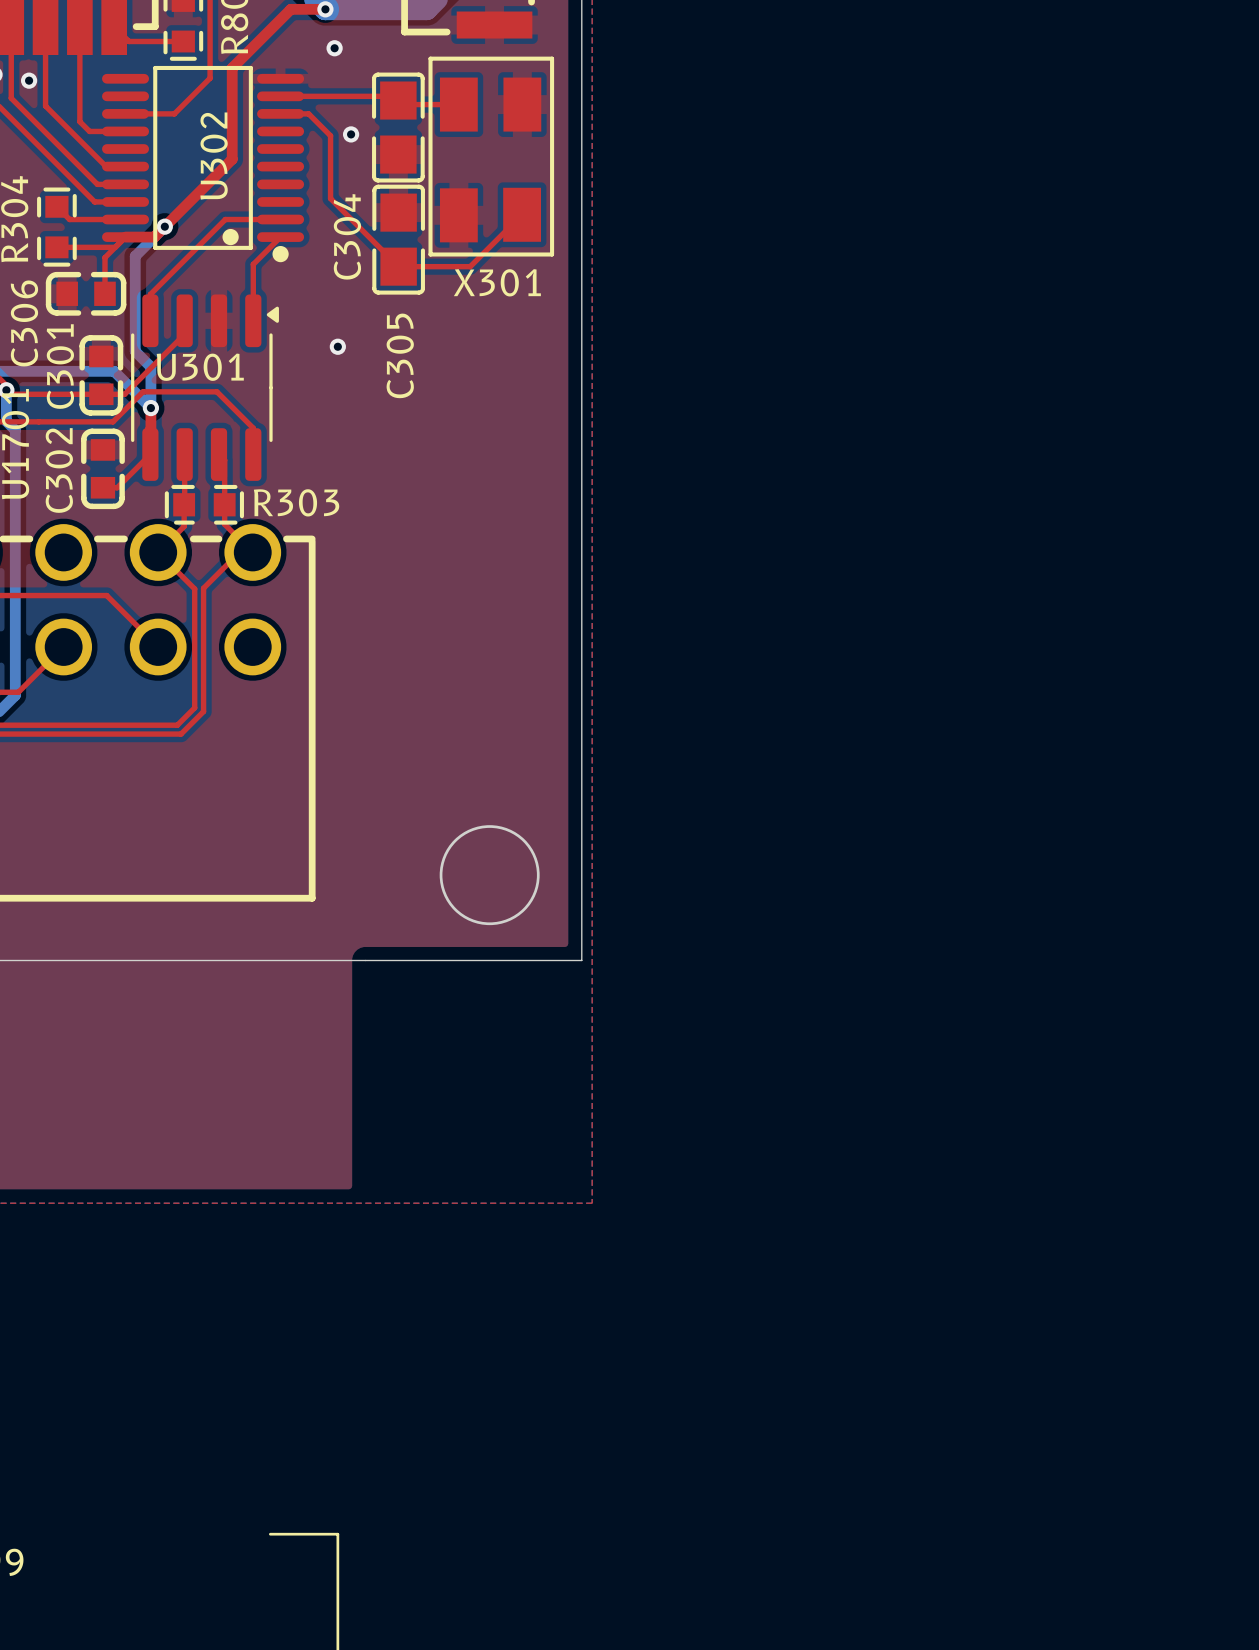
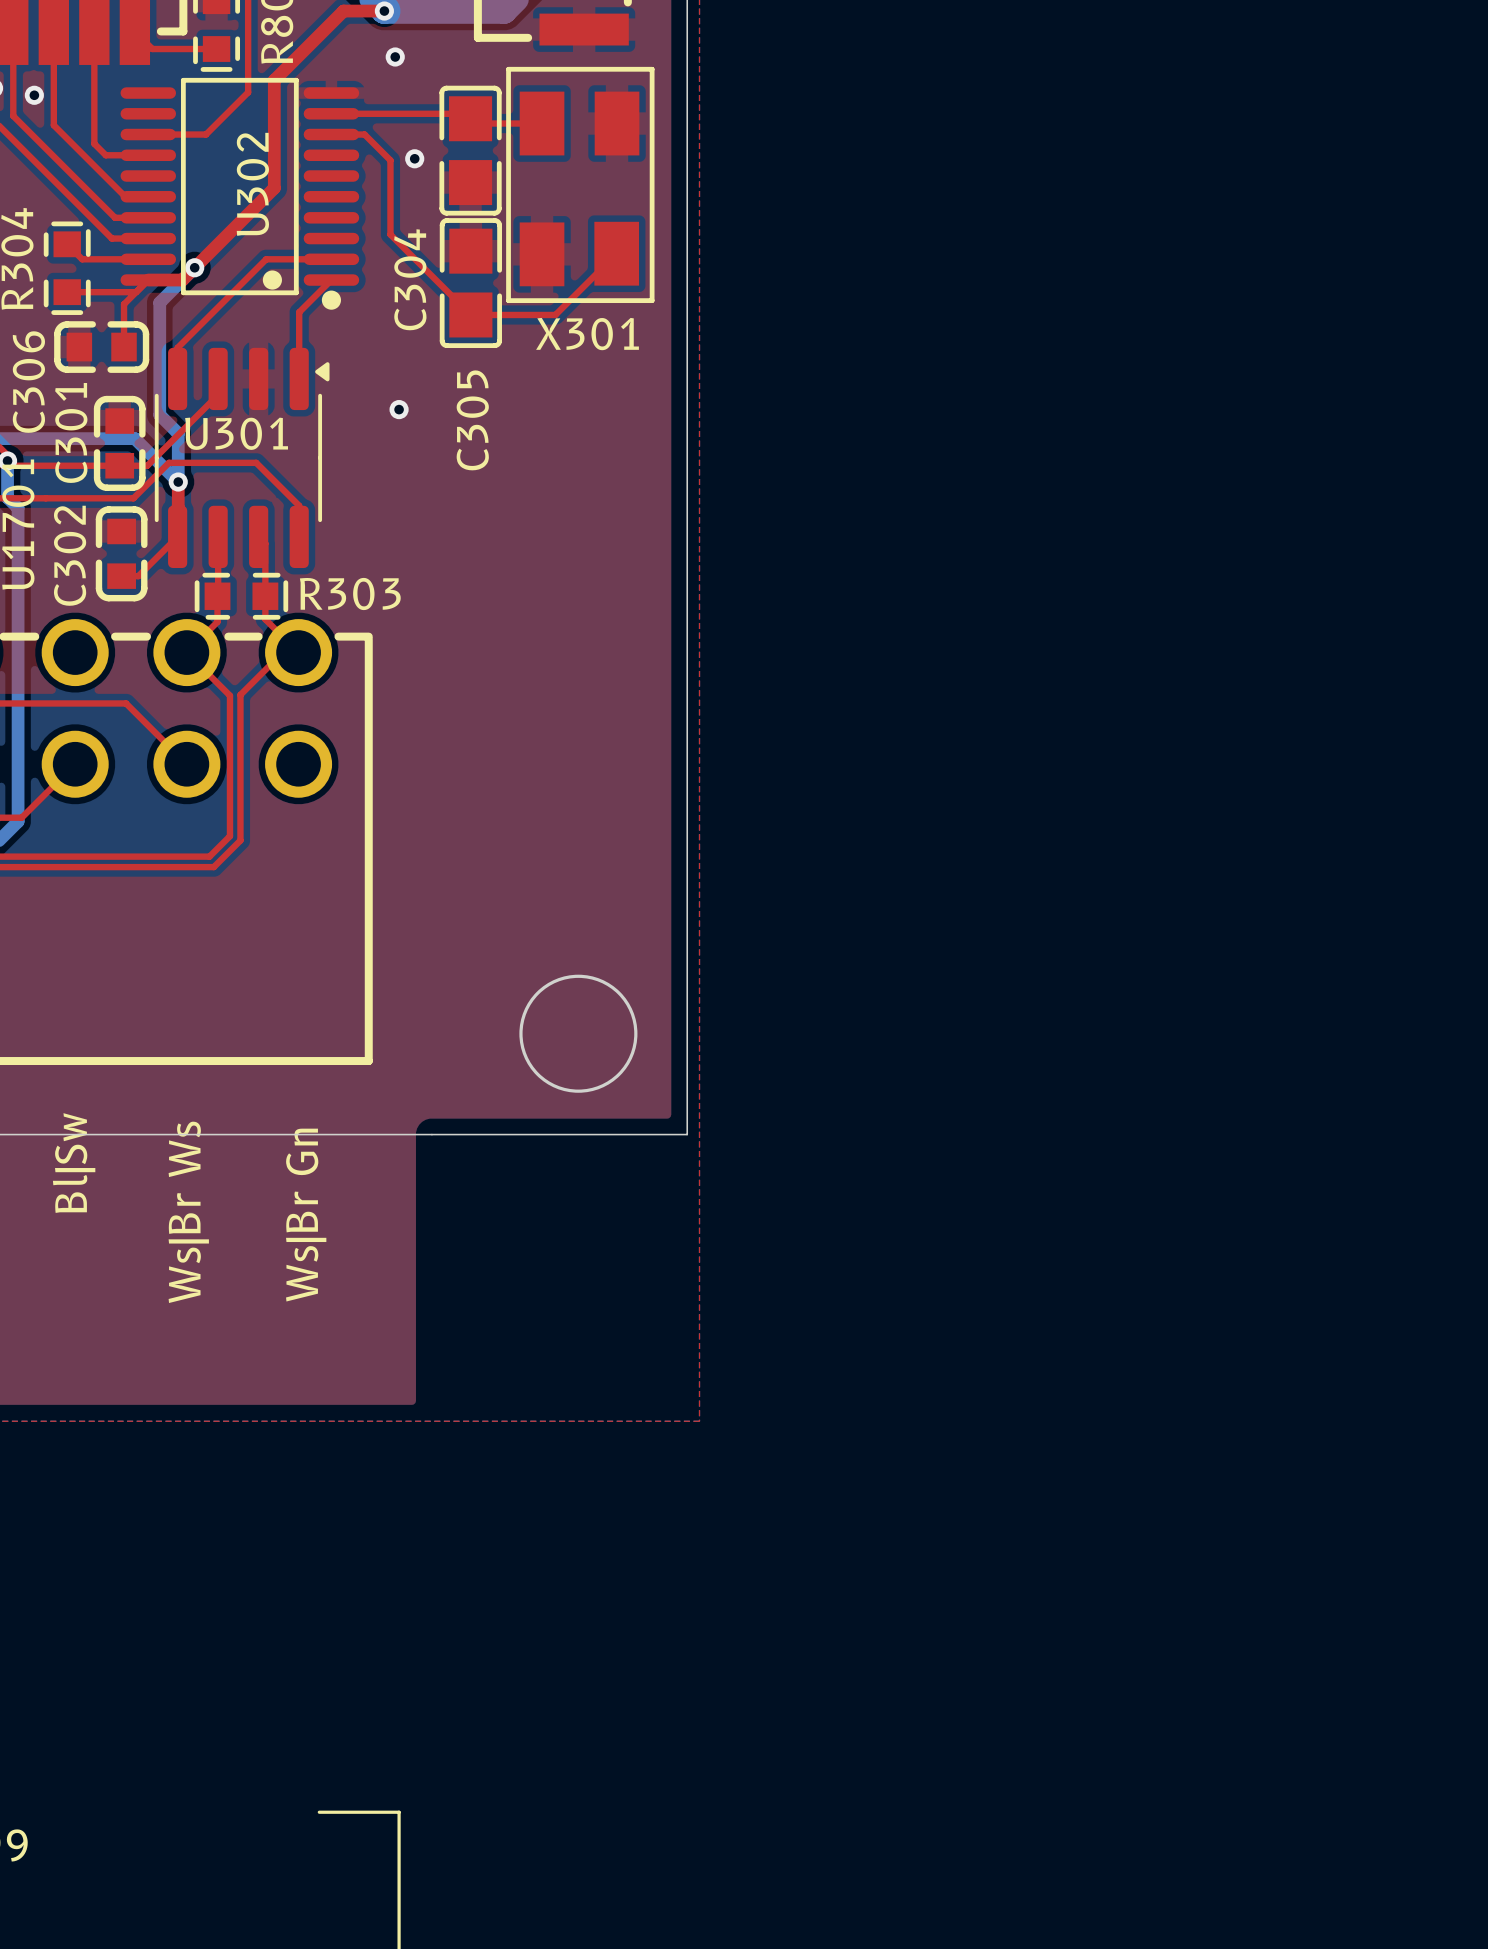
text: none -> Bl|Sw (74, 1163)
text: none -> Ws|Br Ws (188, 1212)
text: none -> Ws|Br Gn (306, 1215)

